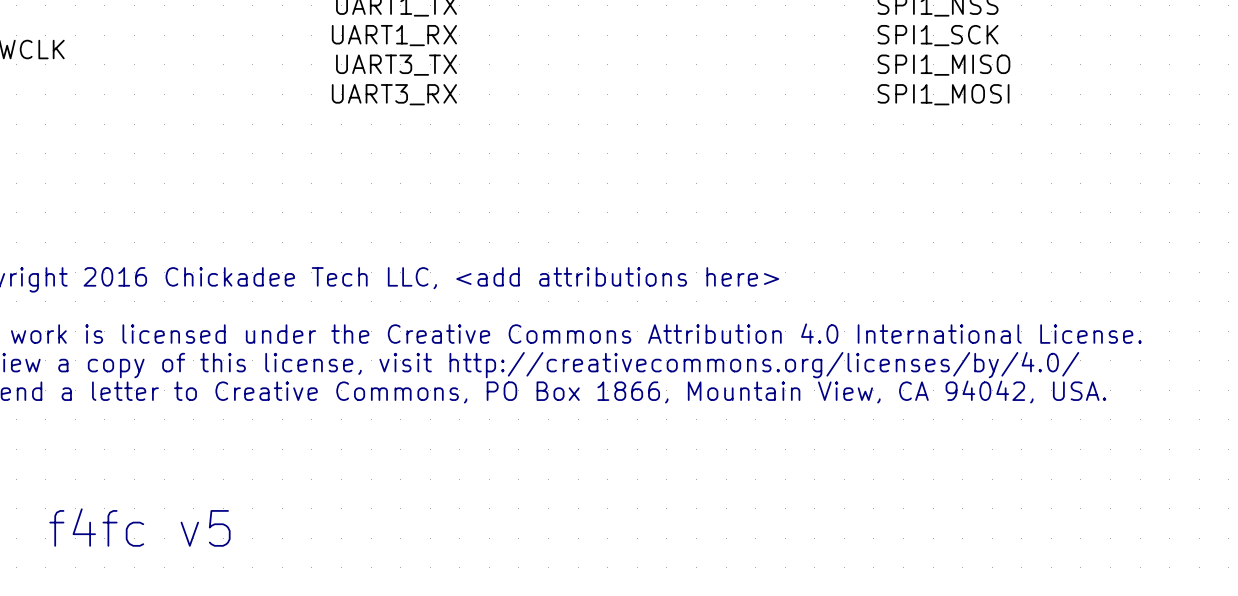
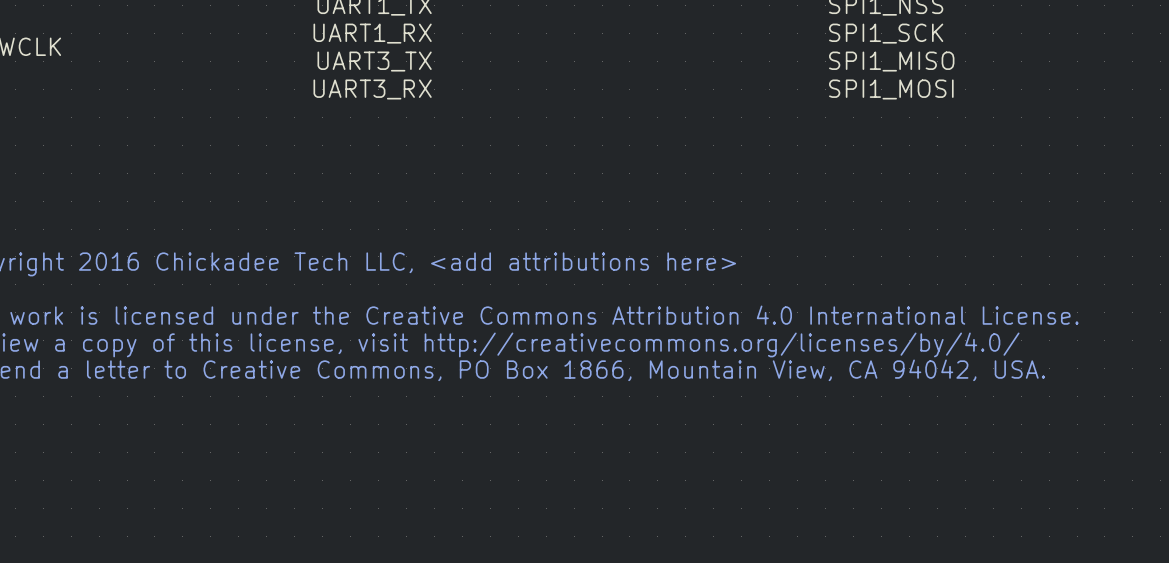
text: f4fc v5 (139, 527) -> none

